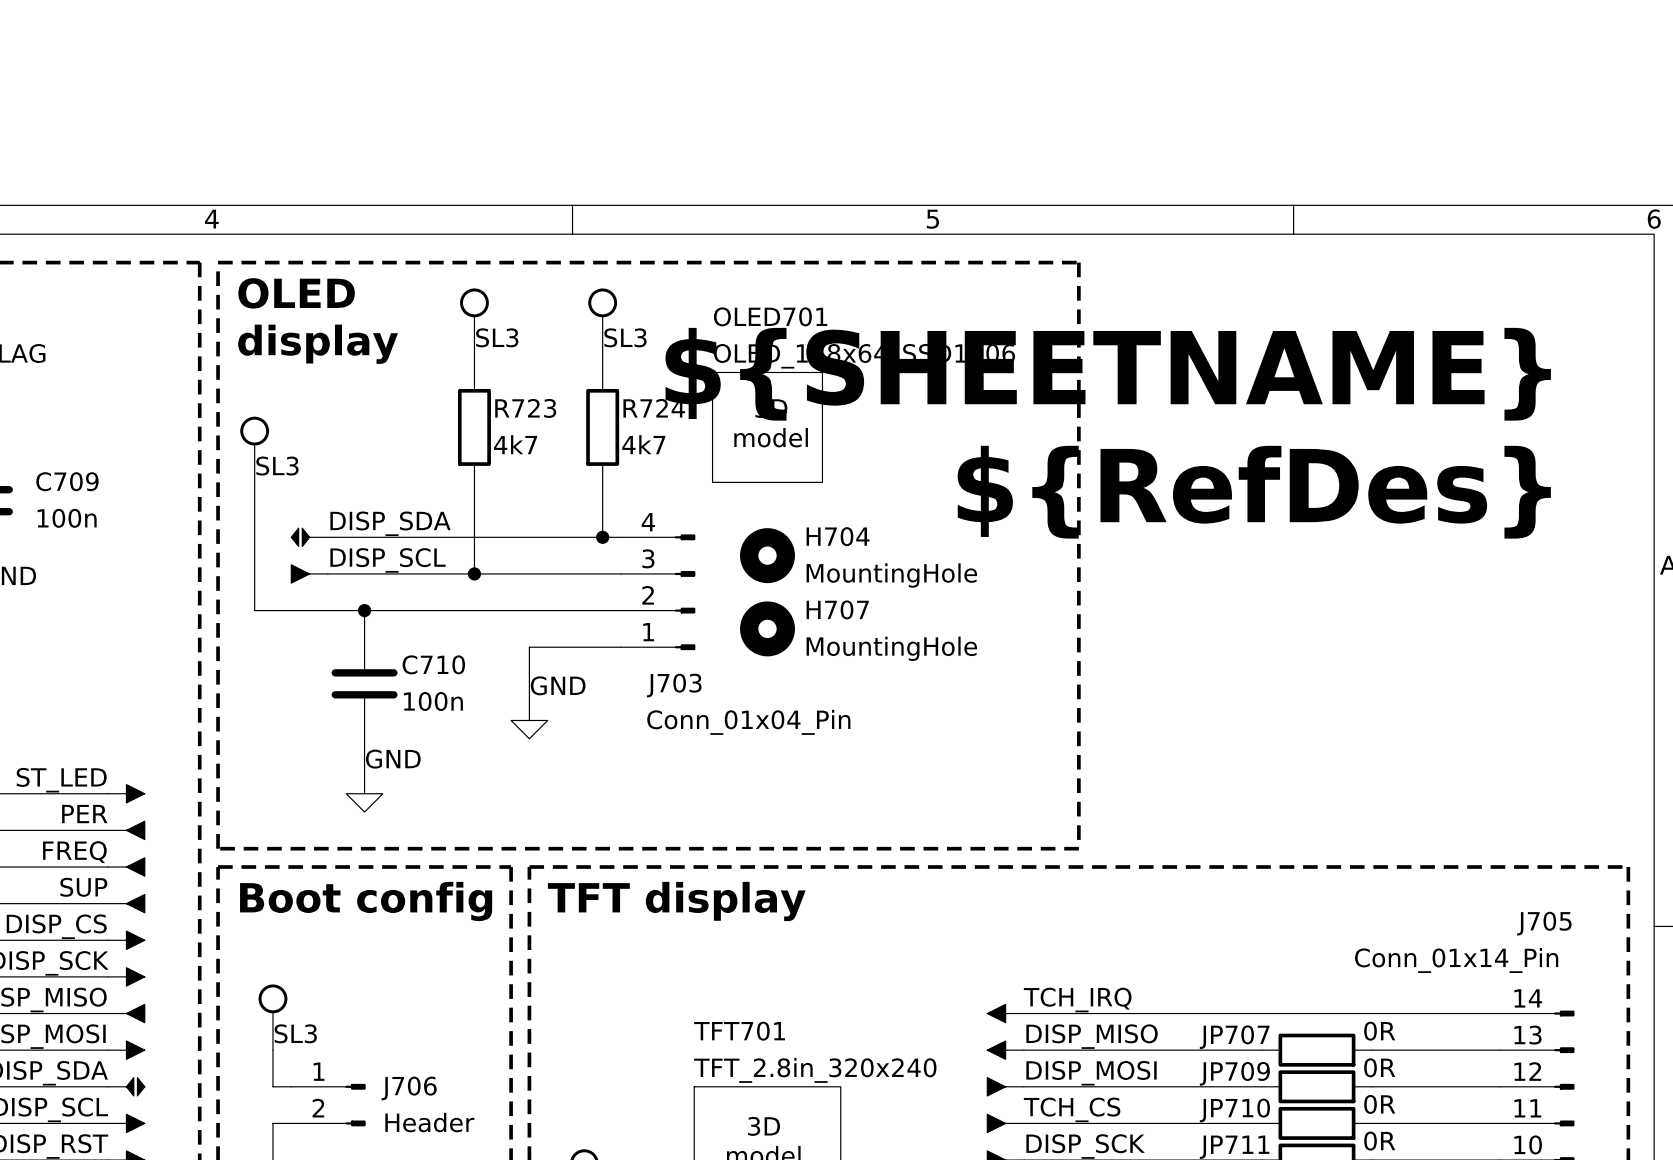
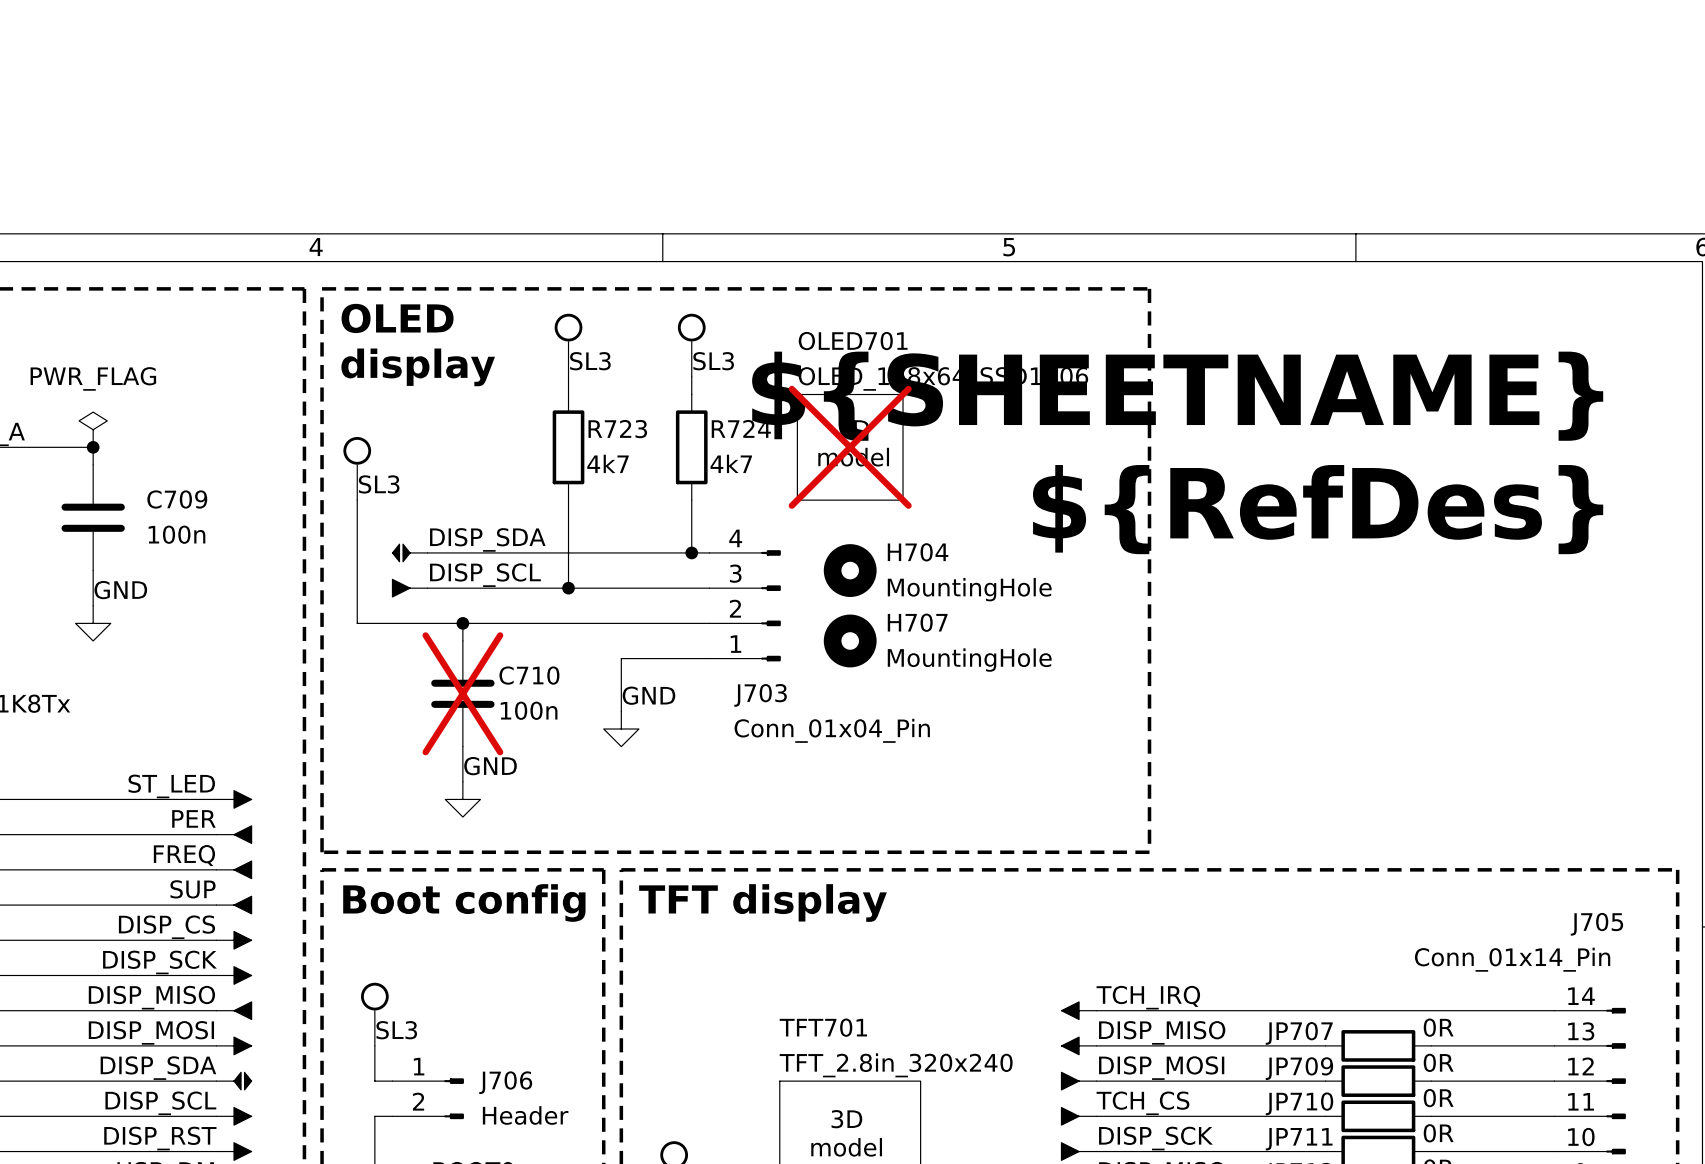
OLED701 do-not-place cross: none -> (850, 447)
C710 do-not-place cross: none -> (462, 693)

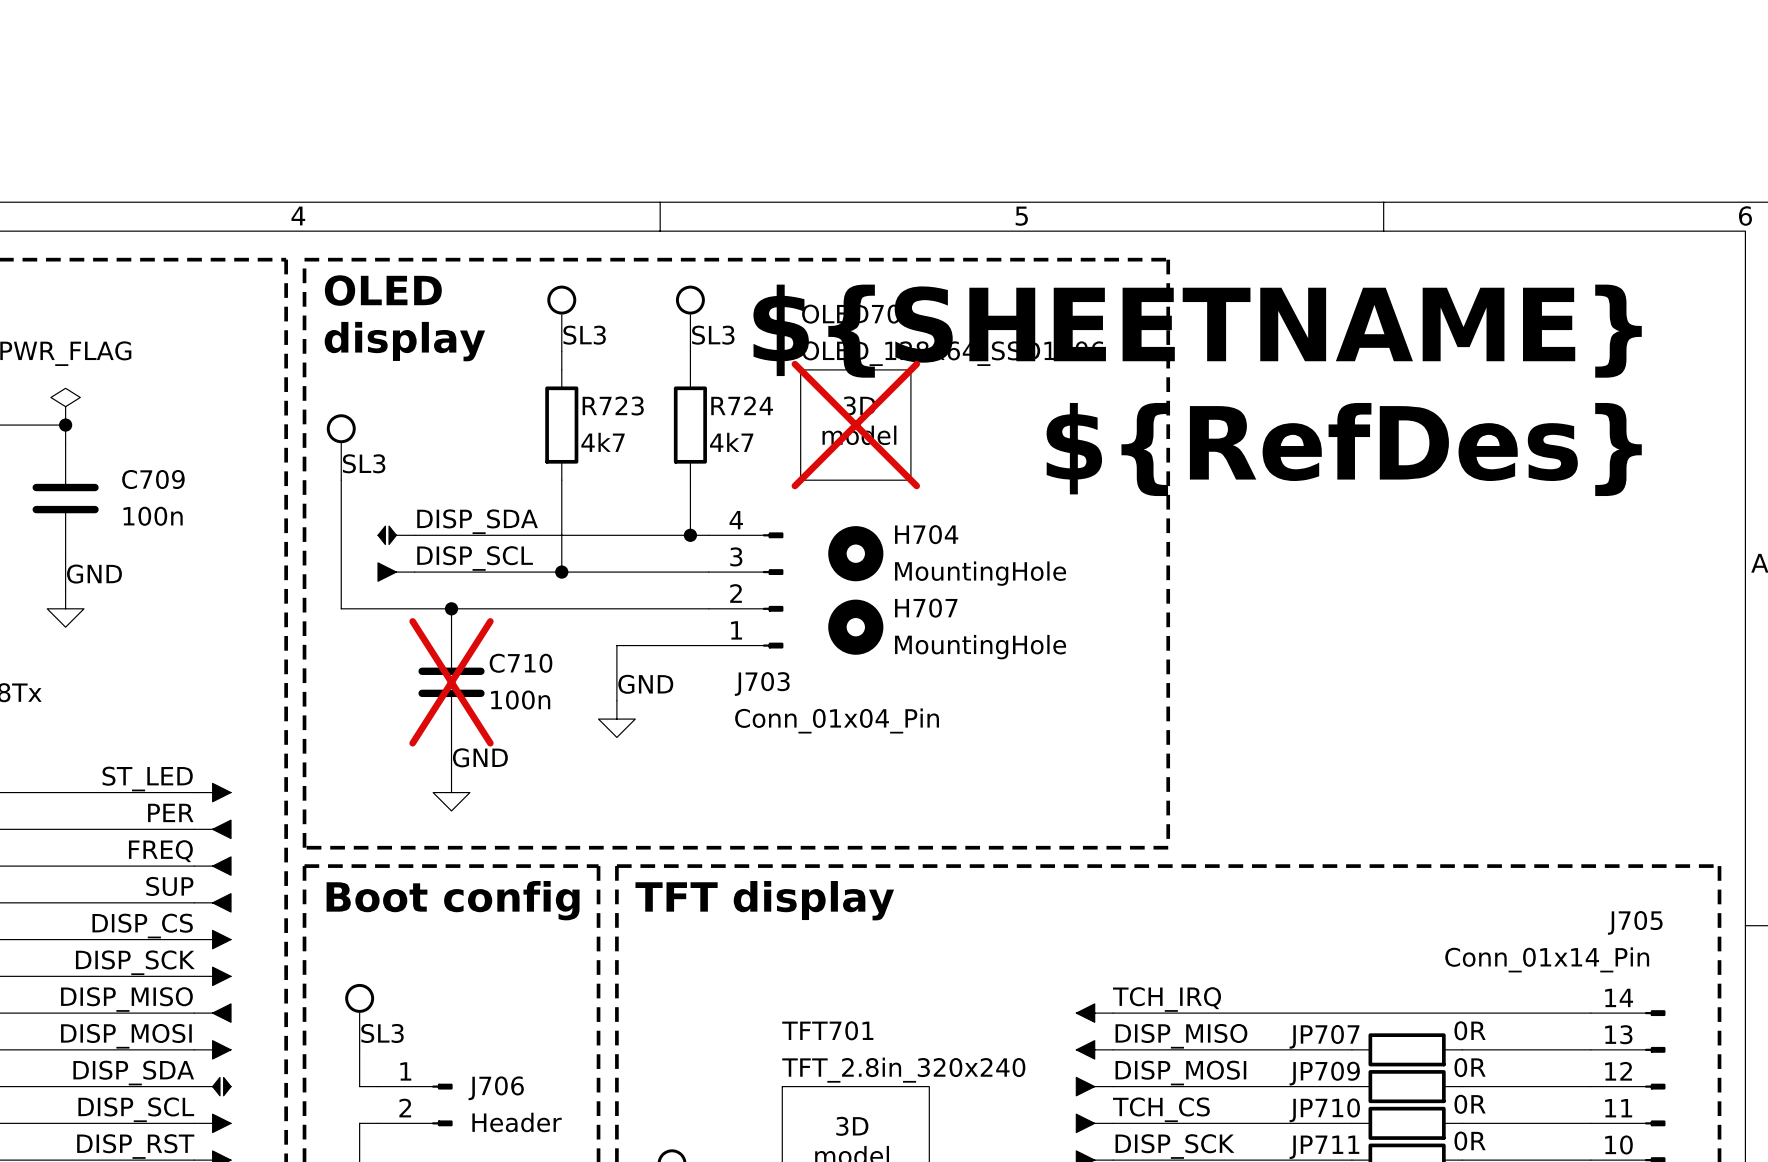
text position: ${SHEETNAME} (1177, 396) -> ${SHEETNAME} (1197, 331)
text position: ${RefDes} (1318, 509) -> ${RefDes} (1344, 449)

